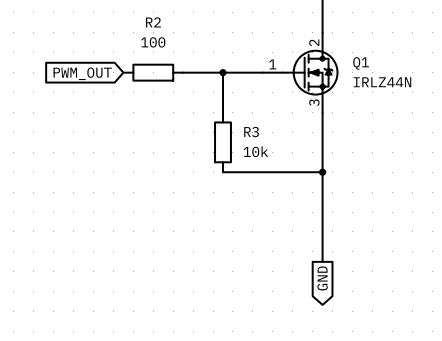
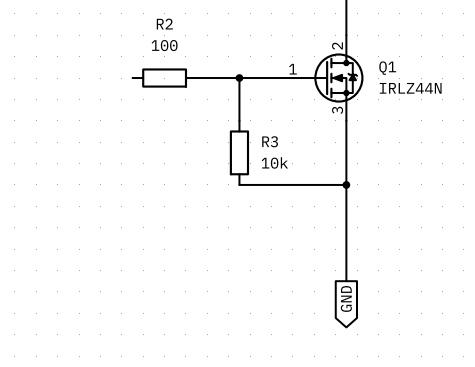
global label: PWM_OUT (82, 73) -> none

